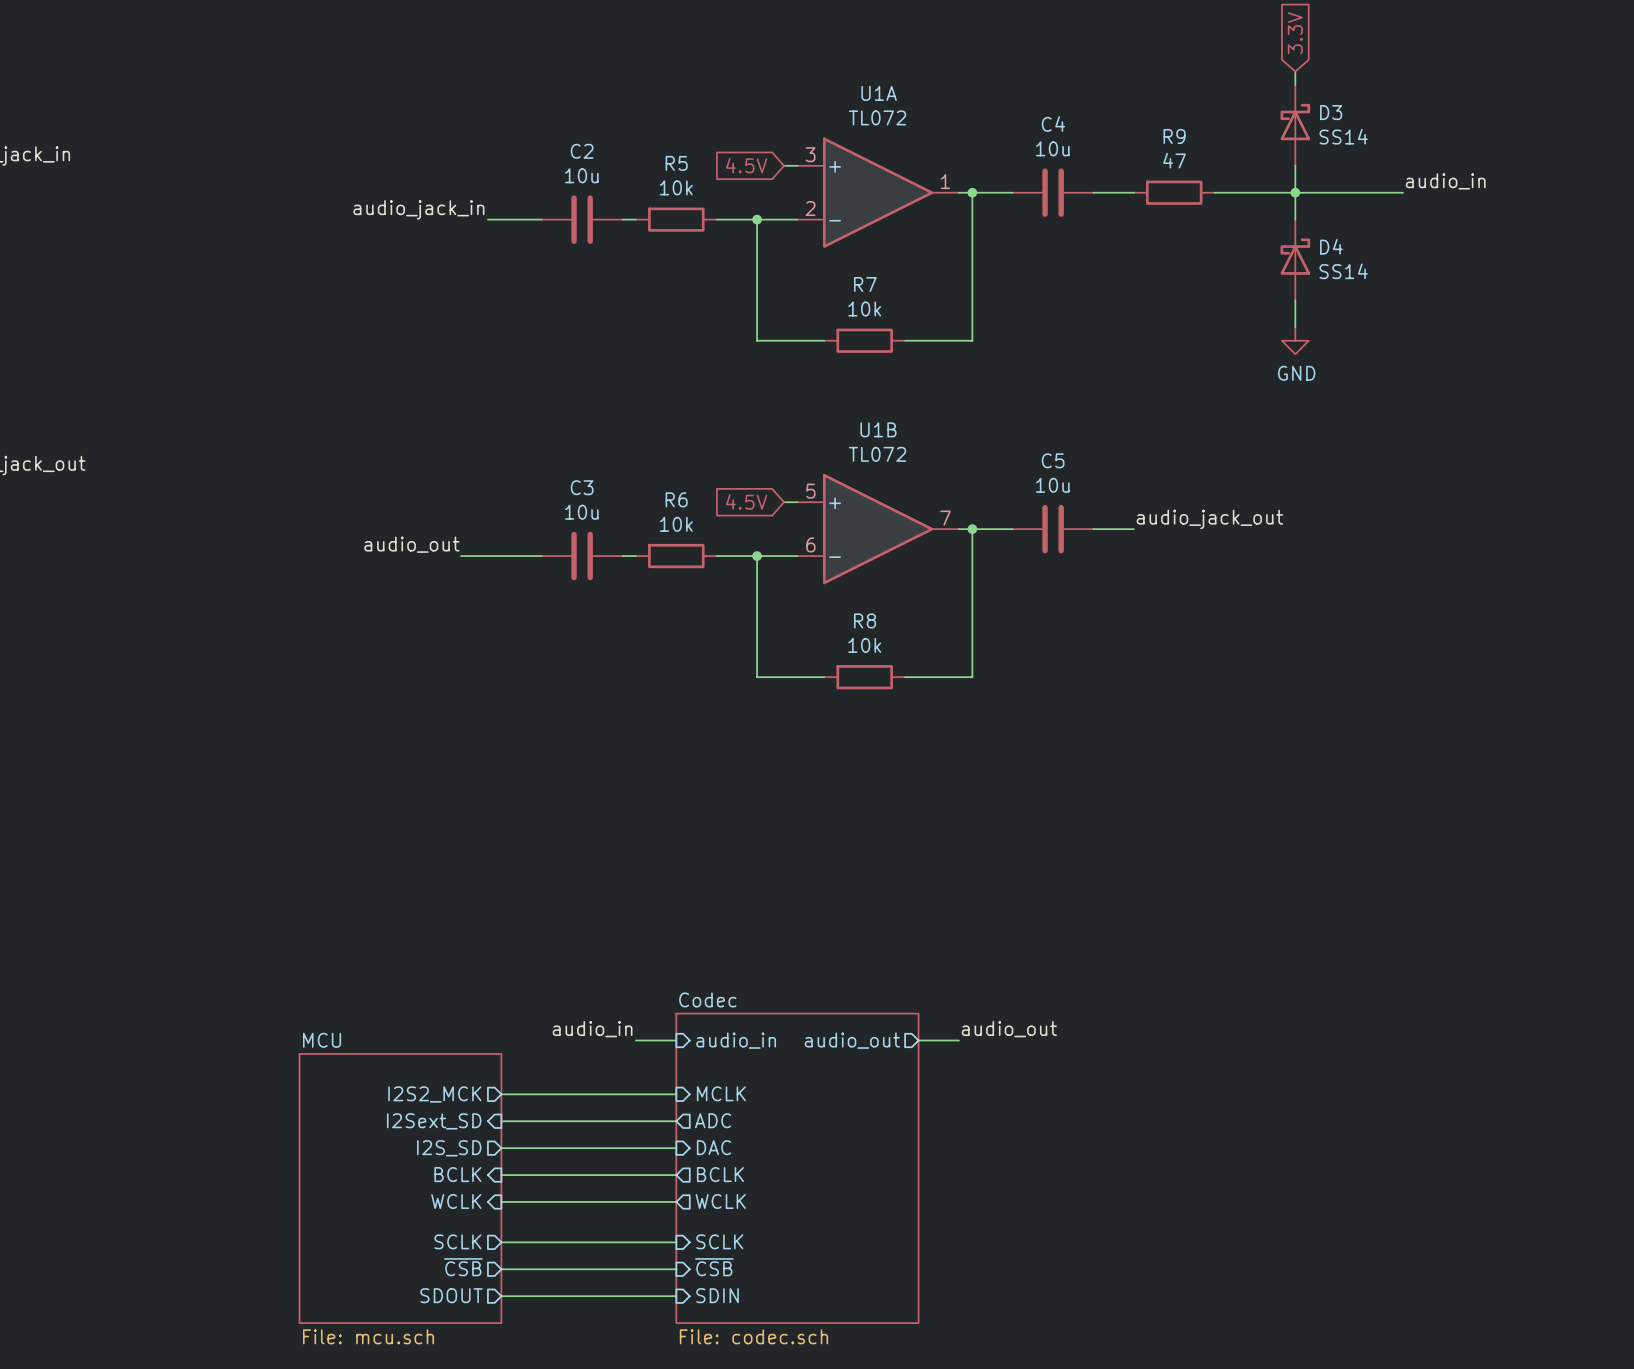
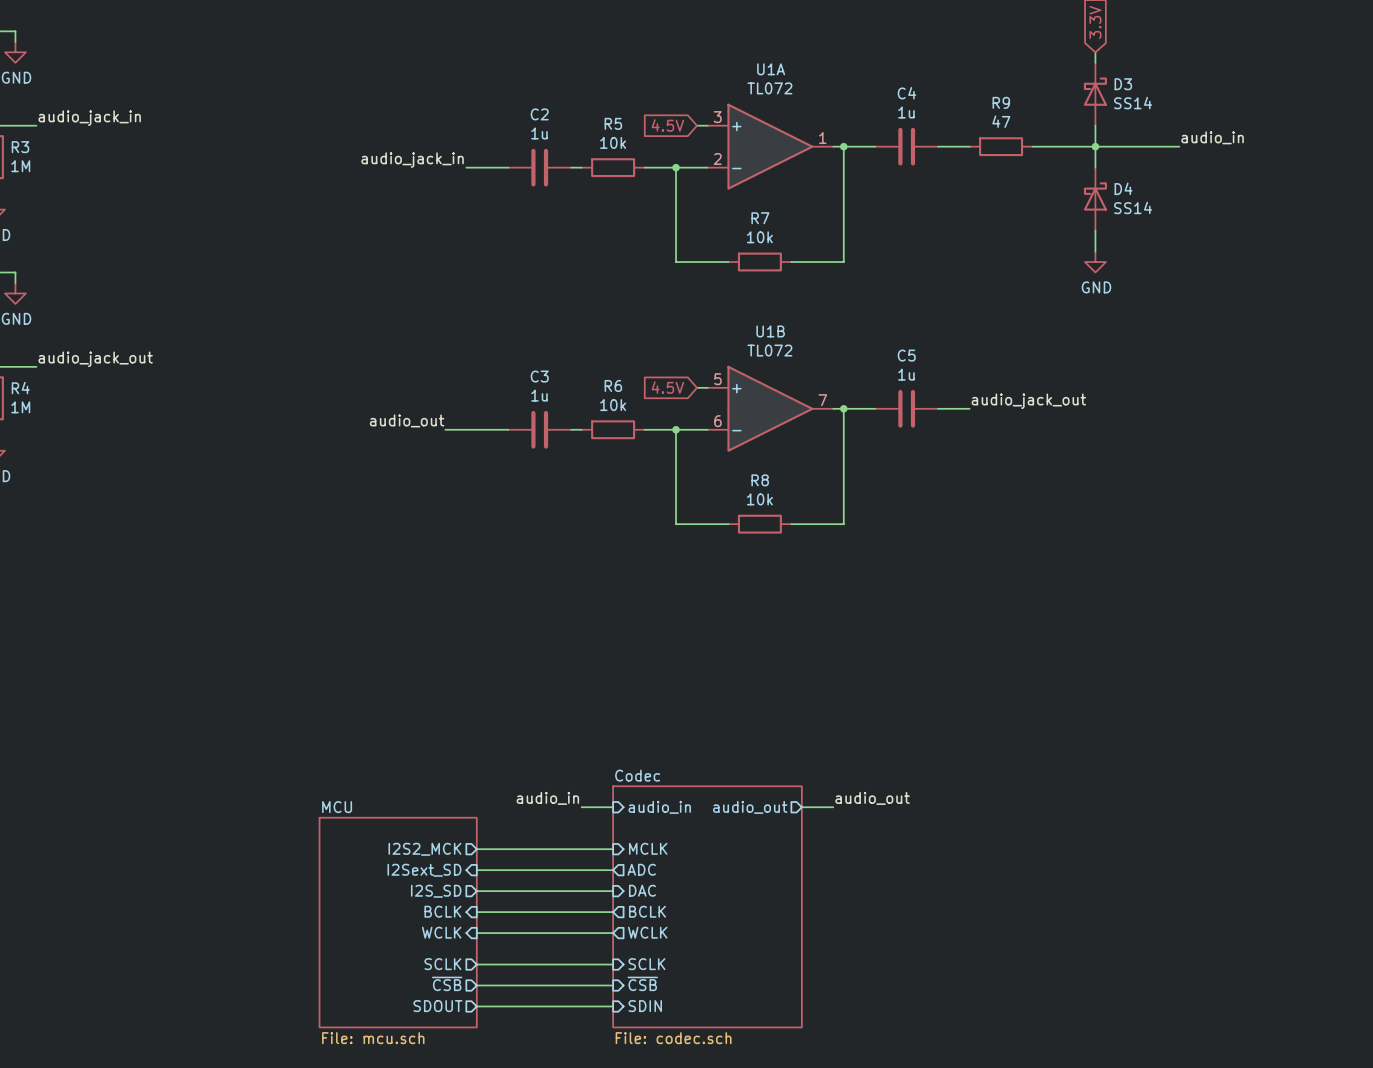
C4 value: 10u (1052, 148) -> 1u (906, 112)
C2 value: 10u (581, 175) -> 1u (539, 133)
C5 value: 10u (1052, 485) -> 1u (906, 374)
C3 value: 10u (581, 512) -> 1u (539, 395)

